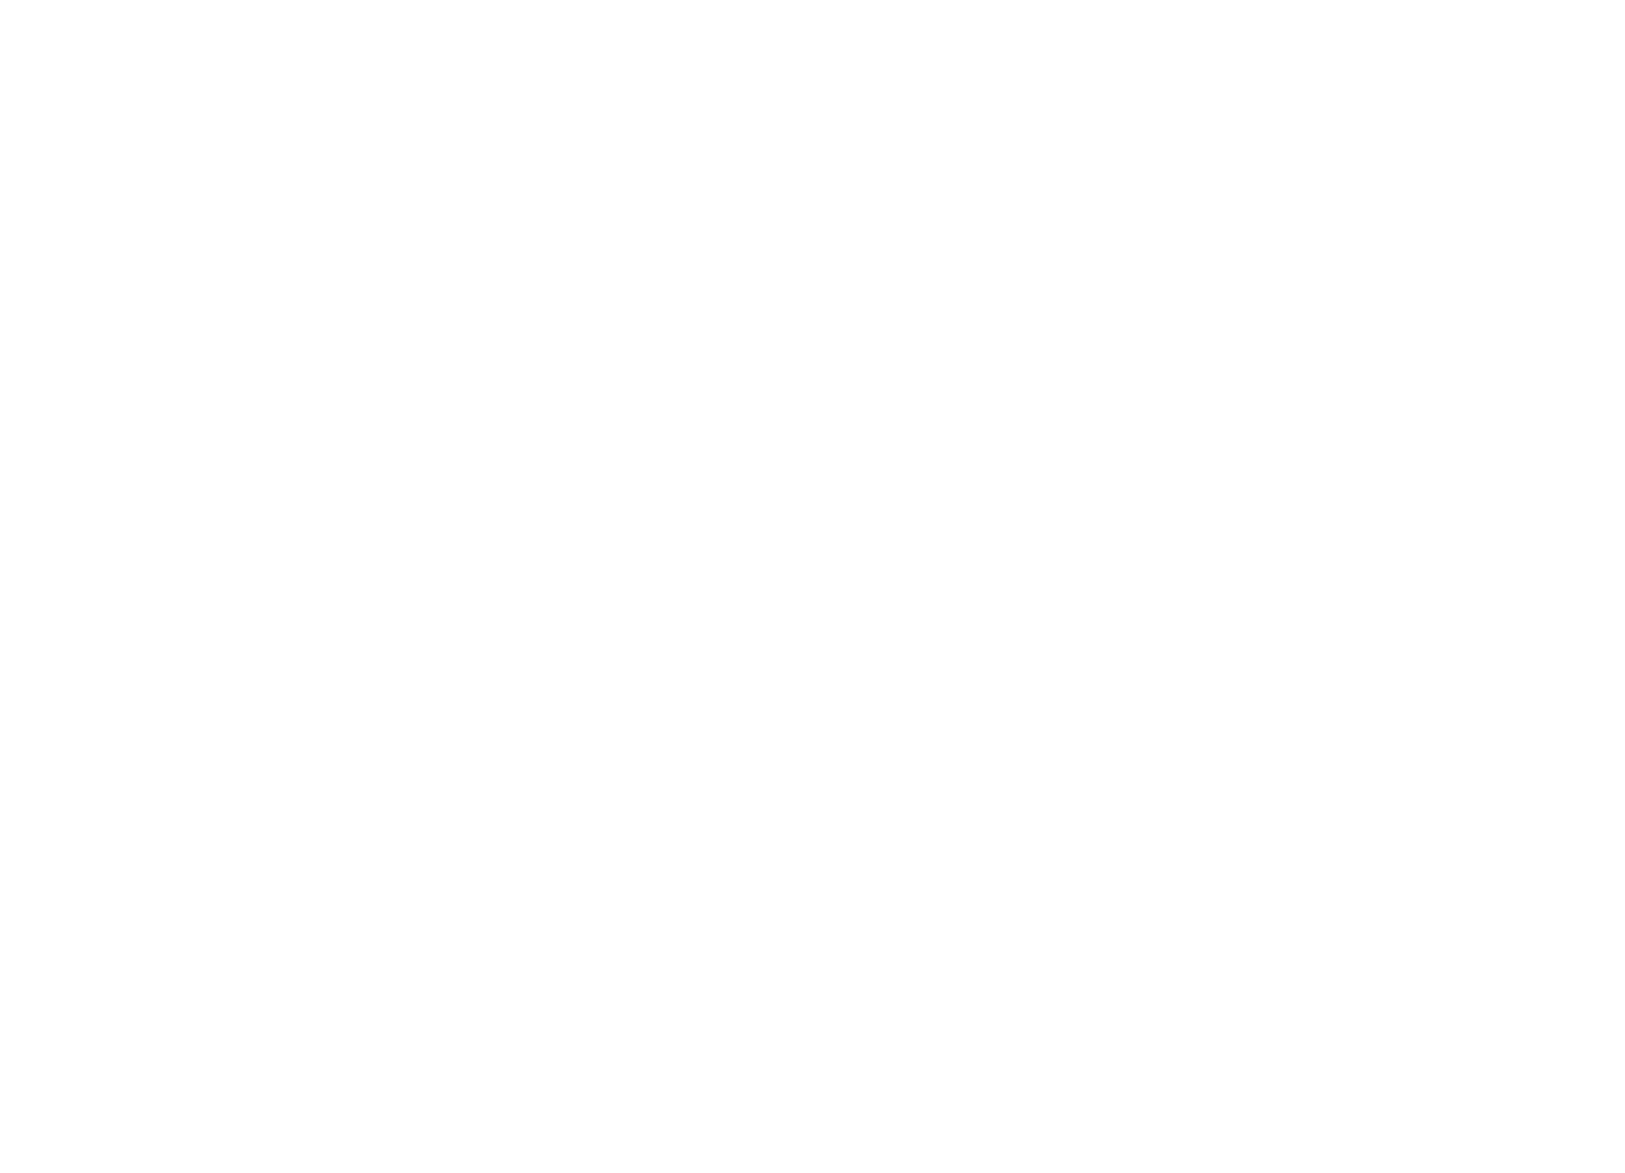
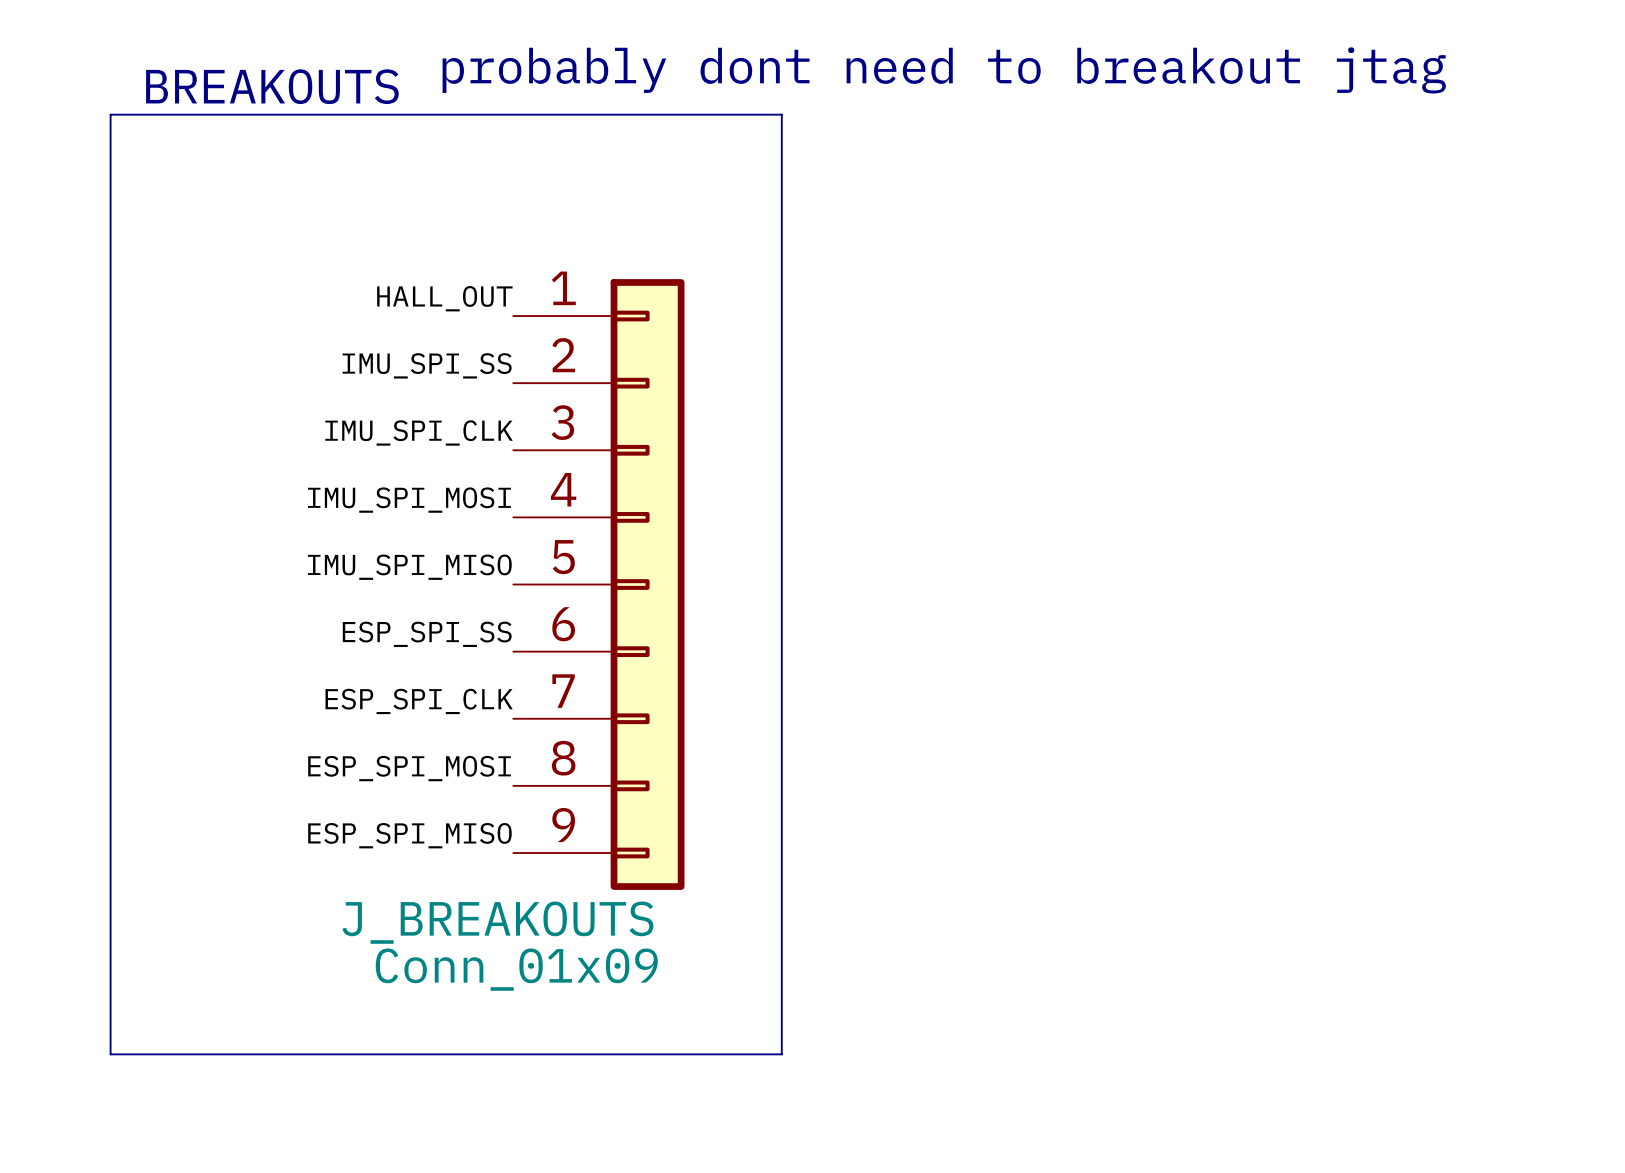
text: none -> probably dont need to breakout jtag (944, 70)
text: none -> BREAKOUTS (272, 86)
line: none -> (110, 114) (781, 114) (781, 1054) (110, 1054) (110, 114)
label: none -> HALL_OUT (444, 298)
label: none -> IMU_SPI_SS (427, 365)
label: none -> IMU_SPI_CLK (419, 432)
label: none -> IMU_SPI_MOSI (409, 500)
label: none -> IMU_SPI_MISO (409, 567)
J_BREAKOUTS: none -> Conn_01x09 (598, 584)
label: none -> ESP_SPI_SS (427, 634)
label: none -> ESP_SPI_CLK (419, 701)
label: none -> ESP_SPI_MOSI (409, 768)
label: none -> ESP_SPI_MISO (409, 835)

